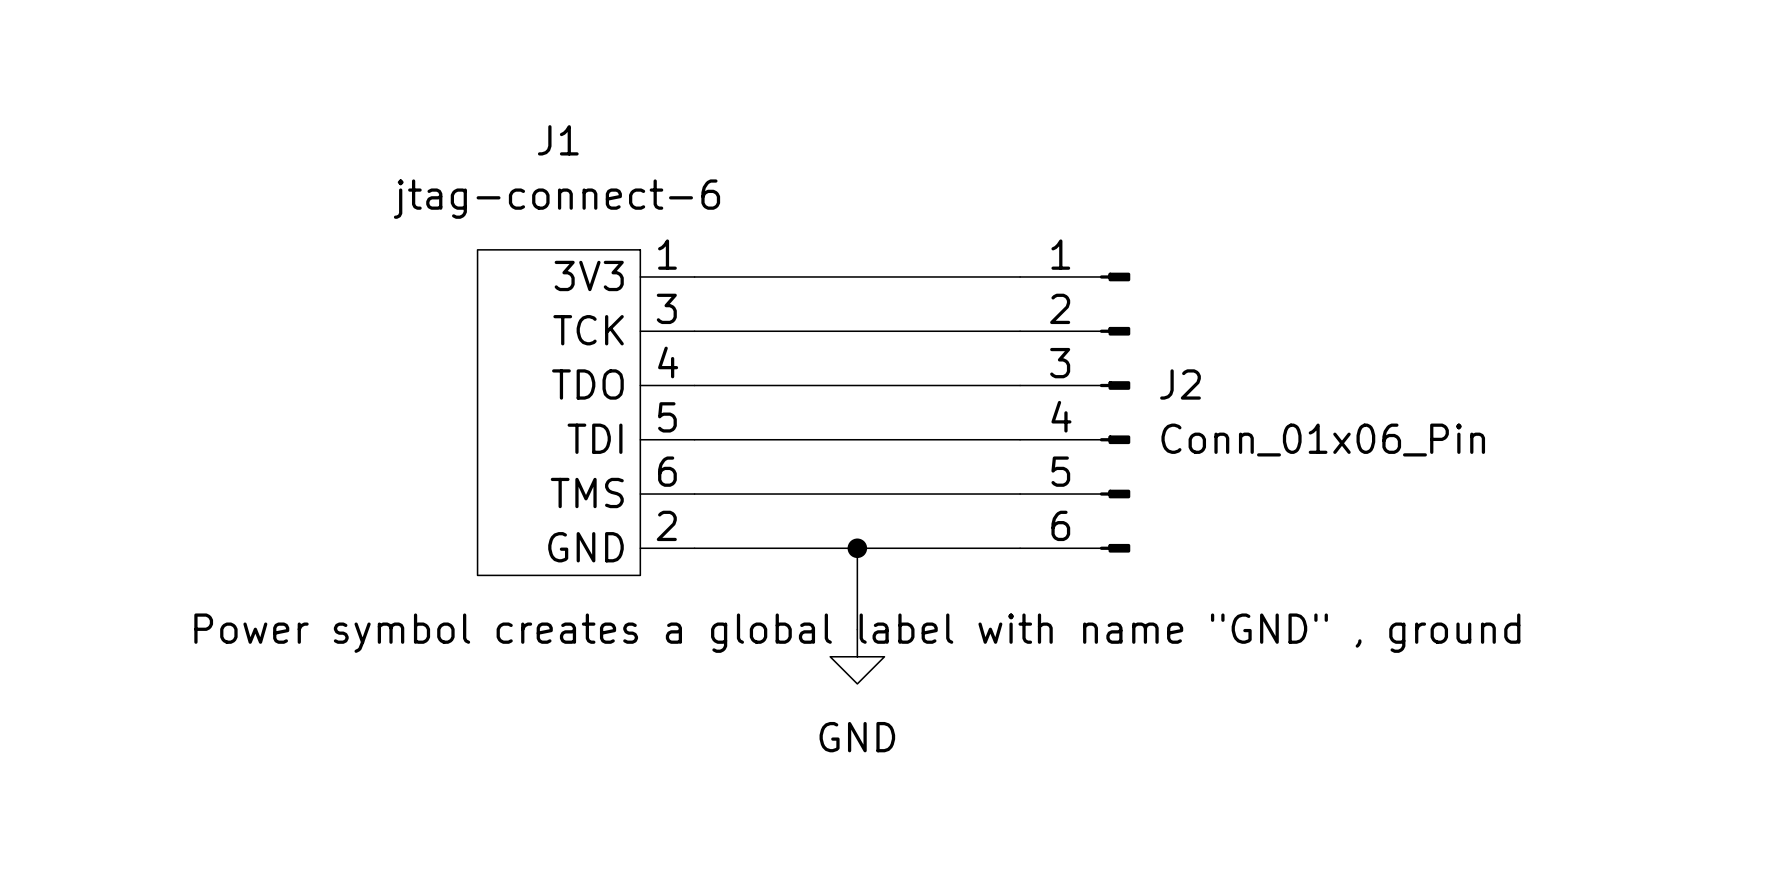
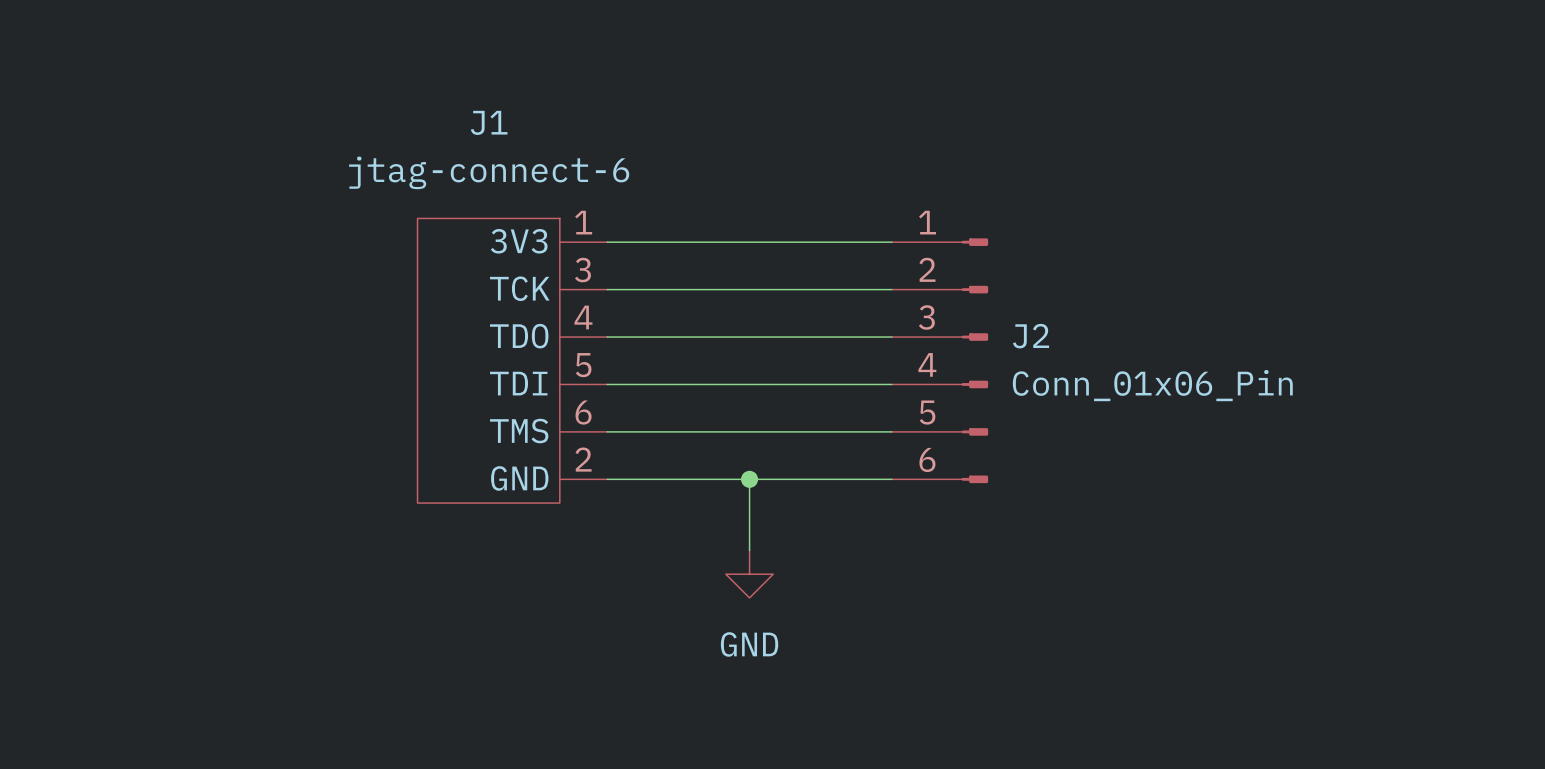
power symbol text: Power symbol creates a global label with name "GND" , ground (857, 633) -> none

